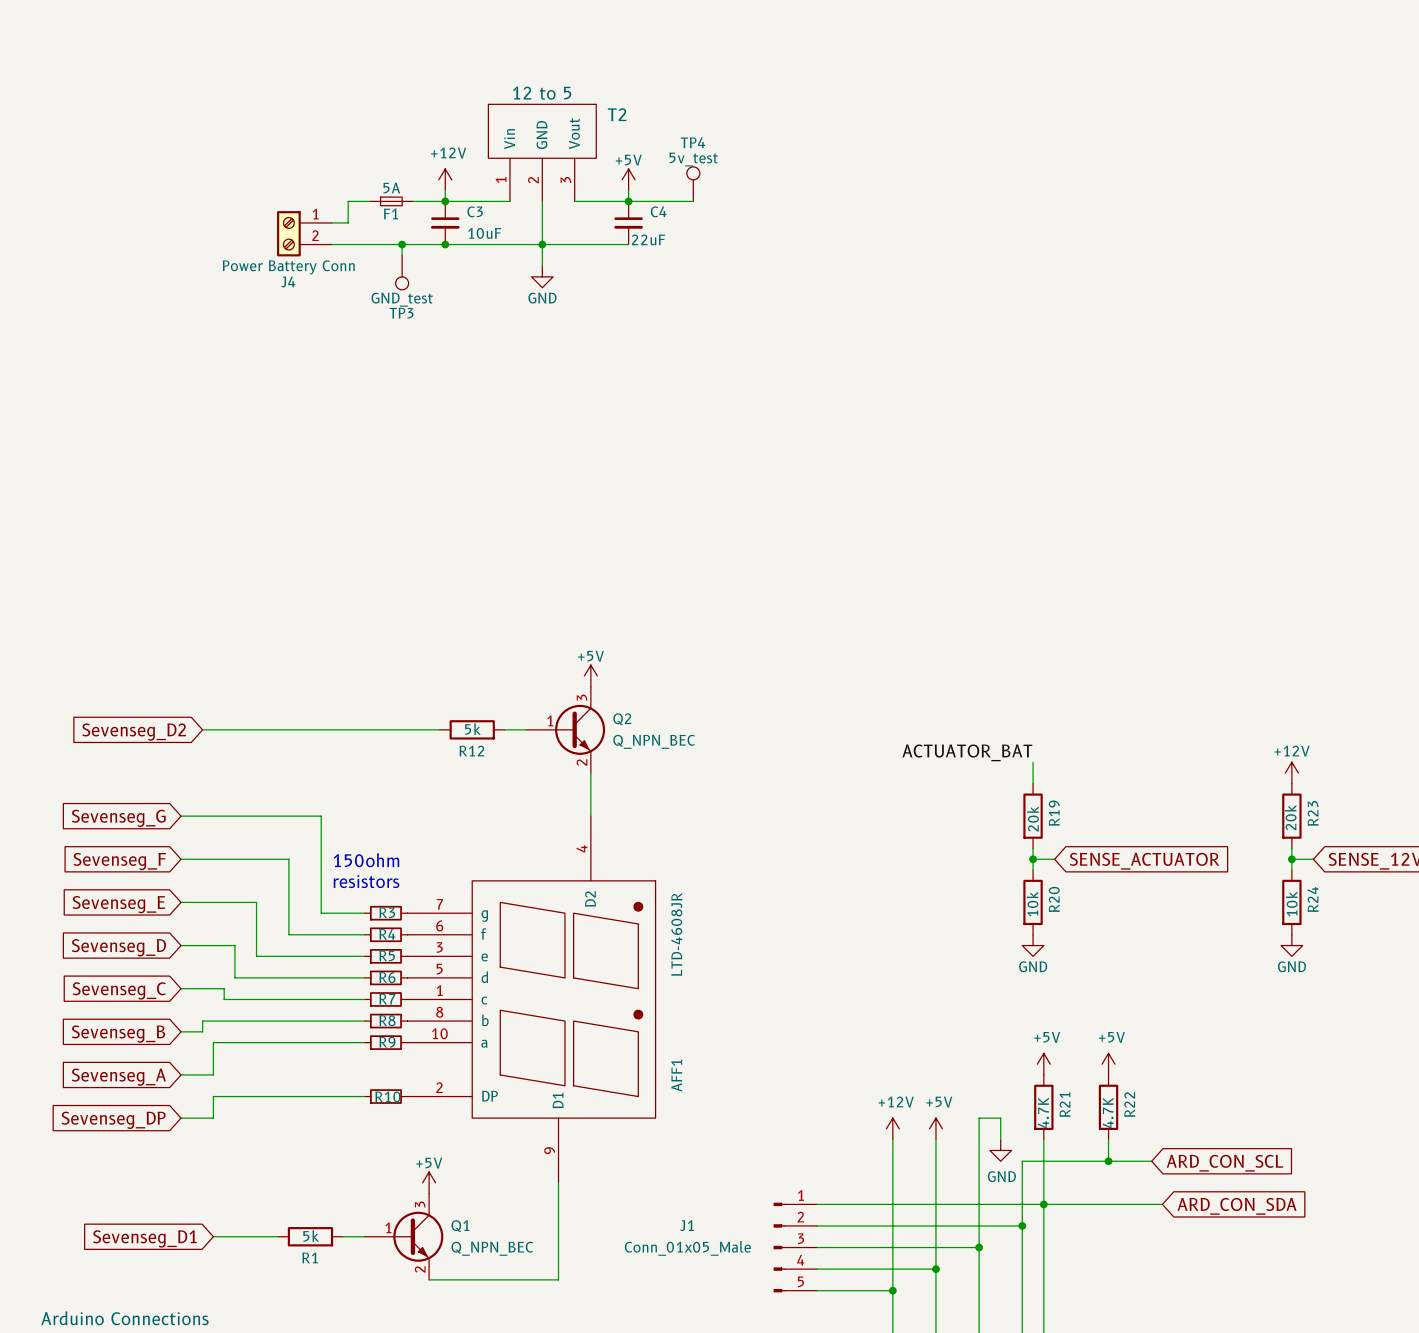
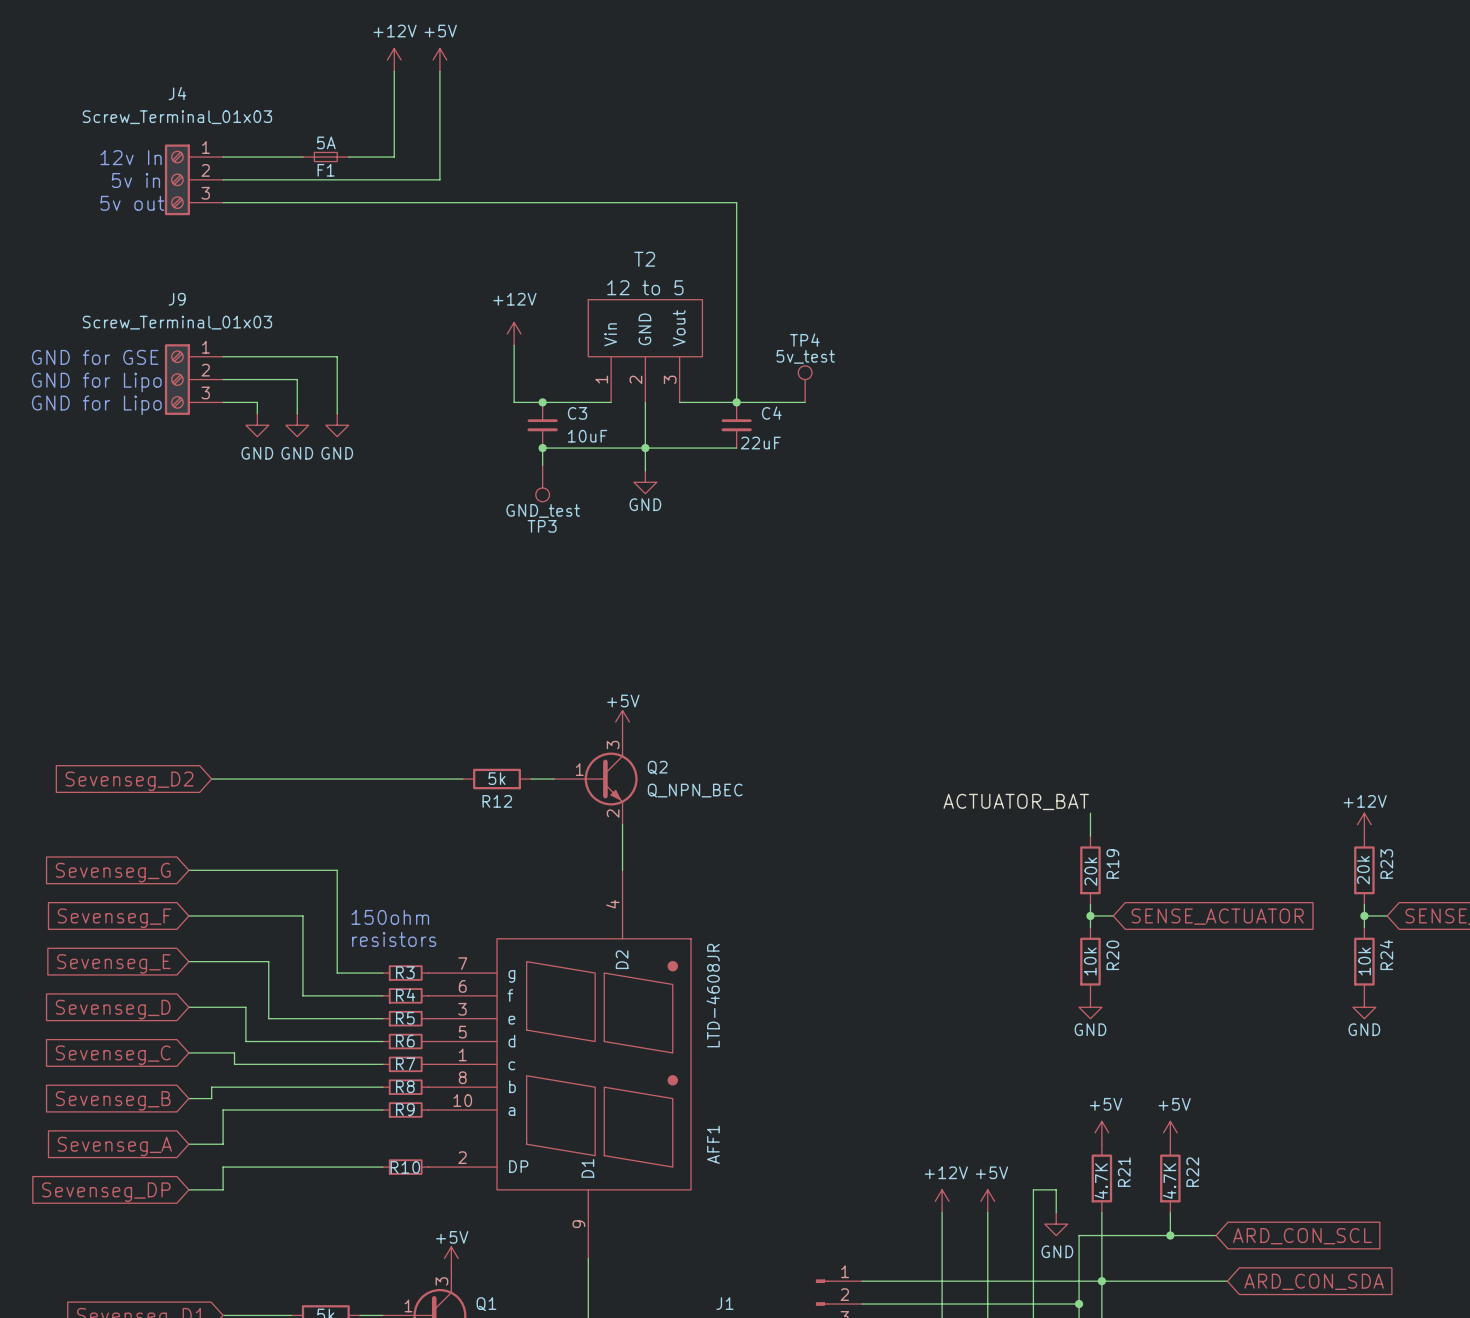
power symbol: none -> +12V (394, 60)
power symbol: none -> +5V (439, 60)
wire: none -> (394, 71) (394, 157) (348, 157)
wire: none -> (439, 71) (439, 179) (223, 179)
T2 name position: T2 (617, 114) -> T2 (644, 259)
text: none -> 12v In (131, 157)
wire: none -> (223, 157) (302, 157)
T2 position: (542, 152) -> (645, 351)
text: none -> 5v in (135, 180)
power symbol: +12V (445, 179) -> none
power symbol: +5V (628, 179) -> none
TP4 position: (693, 184) -> (805, 384)
wire: none -> (223, 202) (736, 202) (736, 402)
text: none -> 5v out (132, 203)
wire: (445, 190) (445, 201) -> none
wire: (628, 190) (628, 201) -> none
wire: (369, 201) (348, 201) (348, 222) (332, 222) -> none
F1 position: (391, 201) -> (325, 157)
wire: (412, 201) (509, 201) -> none
junction: (445, 201) -> none
wire: (542, 201) (542, 266) -> (645, 402) (645, 470)
wire: (574, 201) (693, 201) -> (679, 402) (805, 402)
junction: (628, 201) -> none
J4 symbol: [277, 211, 333, 257] -> [164, 144, 224, 216]
C3 position: (445, 222) -> (542, 425)
C4 position: (628, 222) -> (736, 425)
wire: (332, 244) (628, 244) -> none
wire: (402, 244) (402, 255) -> none
junction: (402, 244) -> none
junction: (445, 244) -> none
junction: (542, 244) -> none
J4 value: Power Battery Conn (288, 267) -> Screw_Terminal_01x03 (177, 117)
TP3 position: (402, 272) -> (542, 483)
power symbol: GND (542, 276) -> none
J4 name position: J4 (288, 281) -> J4 (177, 93)
power symbol: none -> +12V (514, 333)
wire: none -> (514, 345) (514, 402) (611, 402)
wire: none -> (223, 356) (337, 356) (337, 413)
text: none -> GND for GSE (95, 357)
J9: none -> Screw_Terminal_01x03 (193, 379)
wire: none -> (223, 379) (297, 379) (297, 413)
text: none -> GND for Lipo (96, 382)
wire: none -> (223, 402) (257, 402) (257, 413)
junction: none -> (542, 402)
junction: none -> (736, 402)
text: none -> GND for Lipo (96, 405)
power symbol: none -> GND (257, 425)
power symbol: none -> GND (297, 425)
power symbol: none -> GND (337, 425)
junction: none -> (542, 448)
junction: none -> (645, 448)
wire: none -> (736, 448) (542, 448) (542, 465)
power symbol: none -> GND (645, 482)

